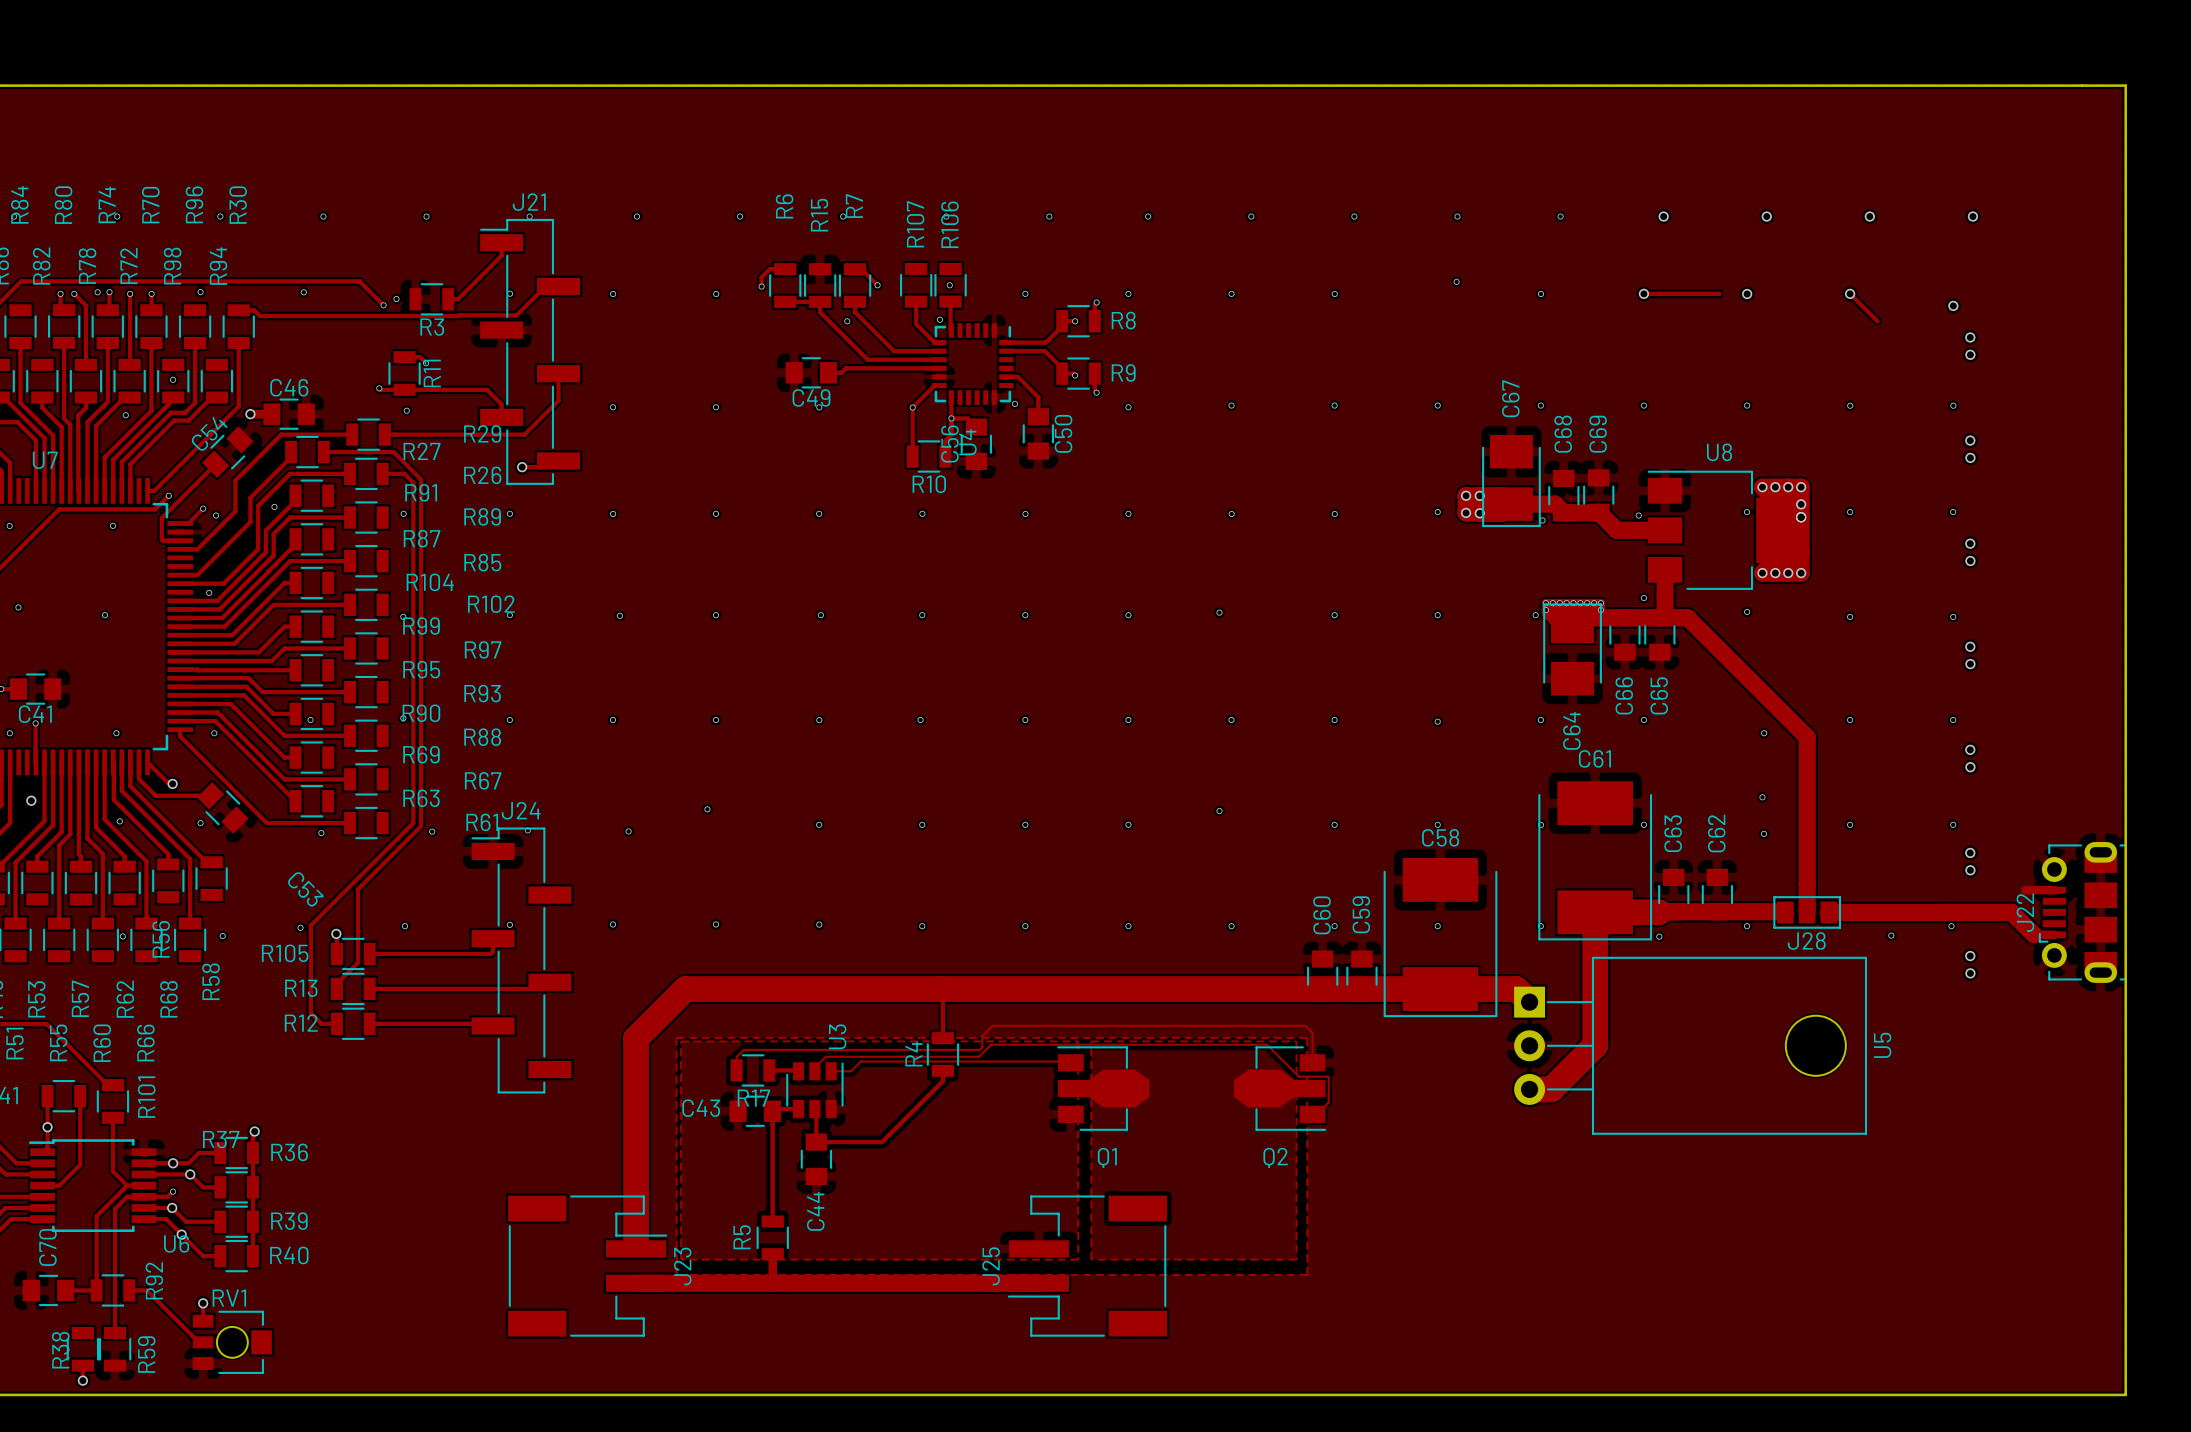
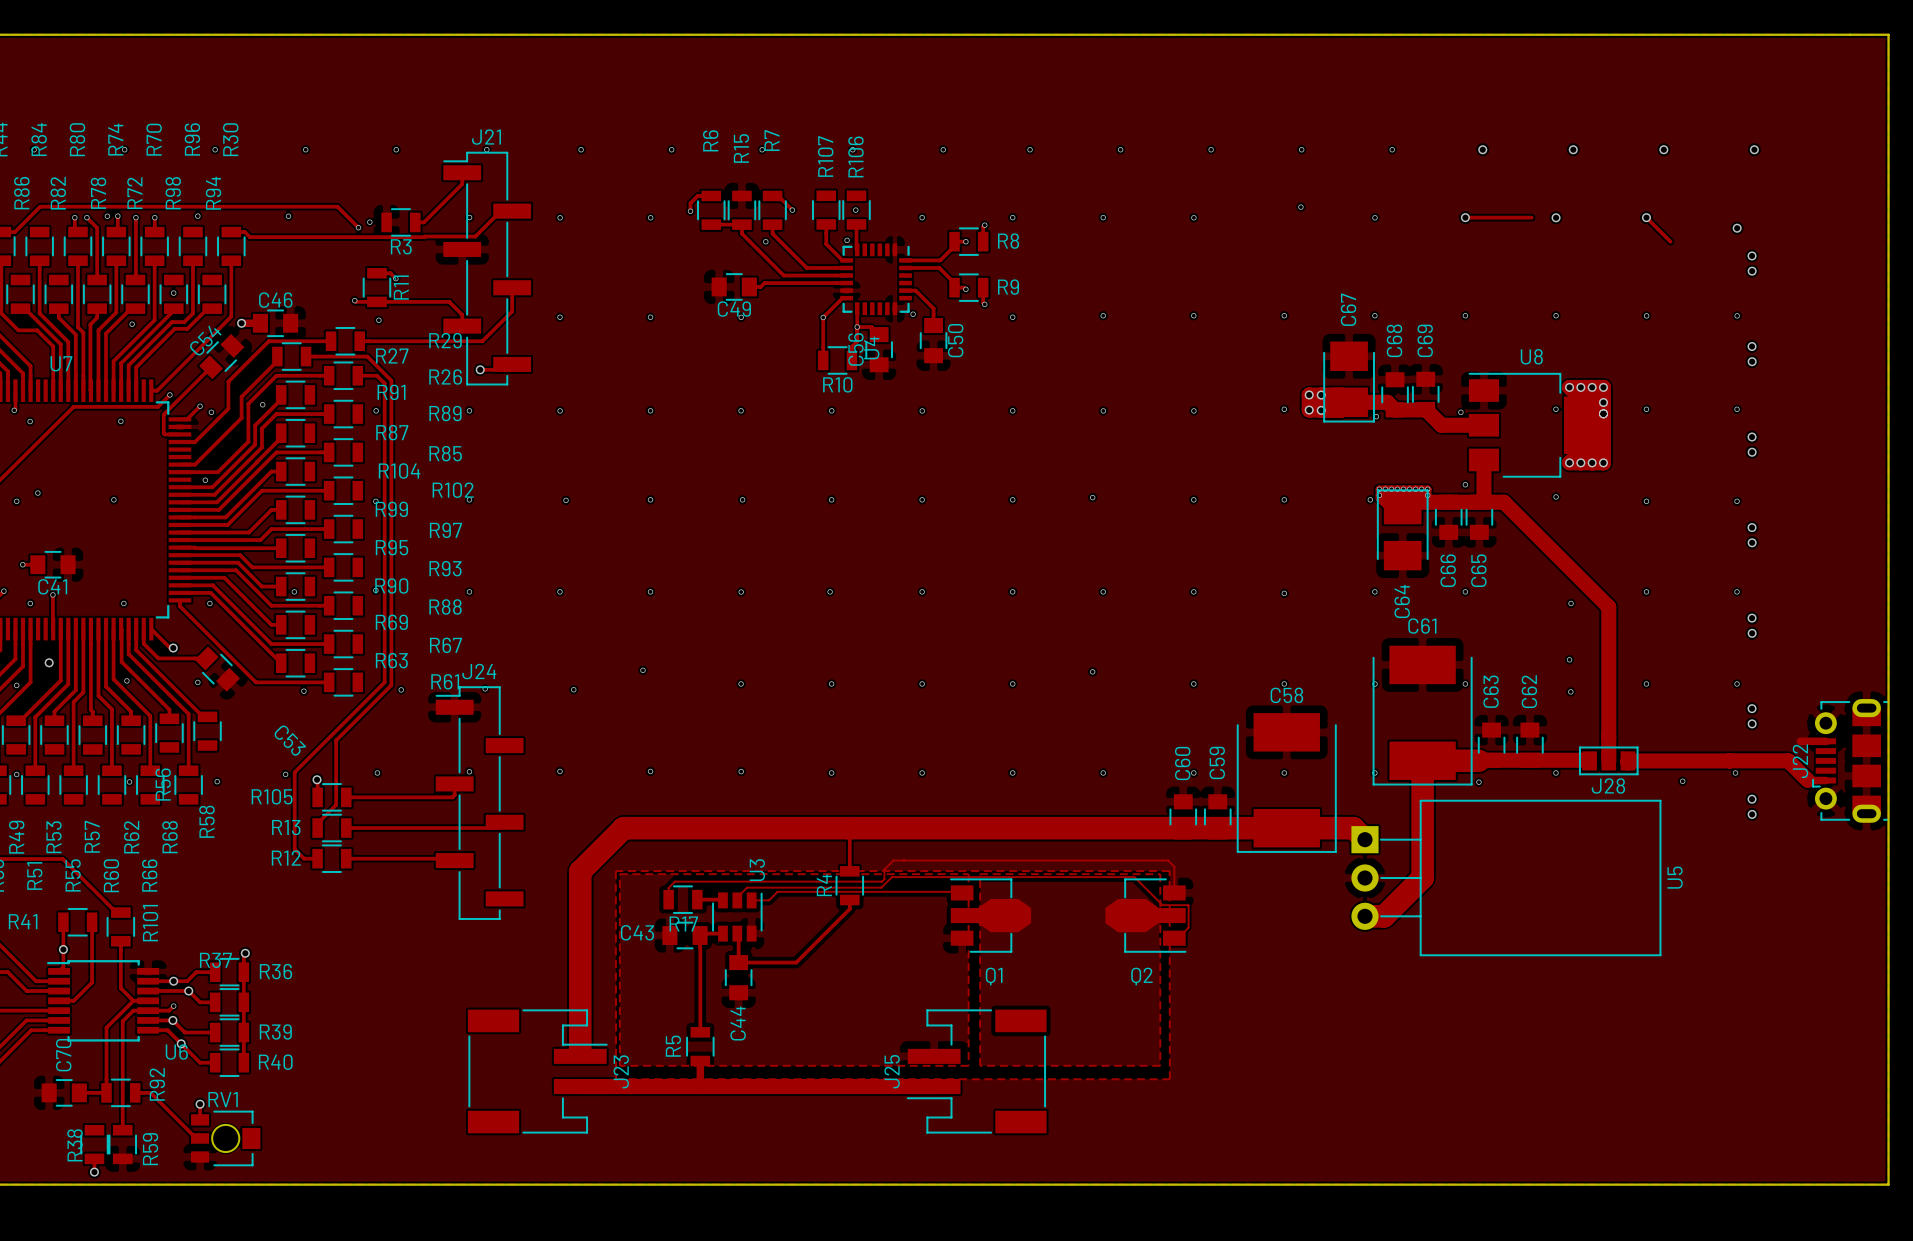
U5 footprint: [1514, 956, 1868, 1135] -> [1351, 799, 1662, 957]

